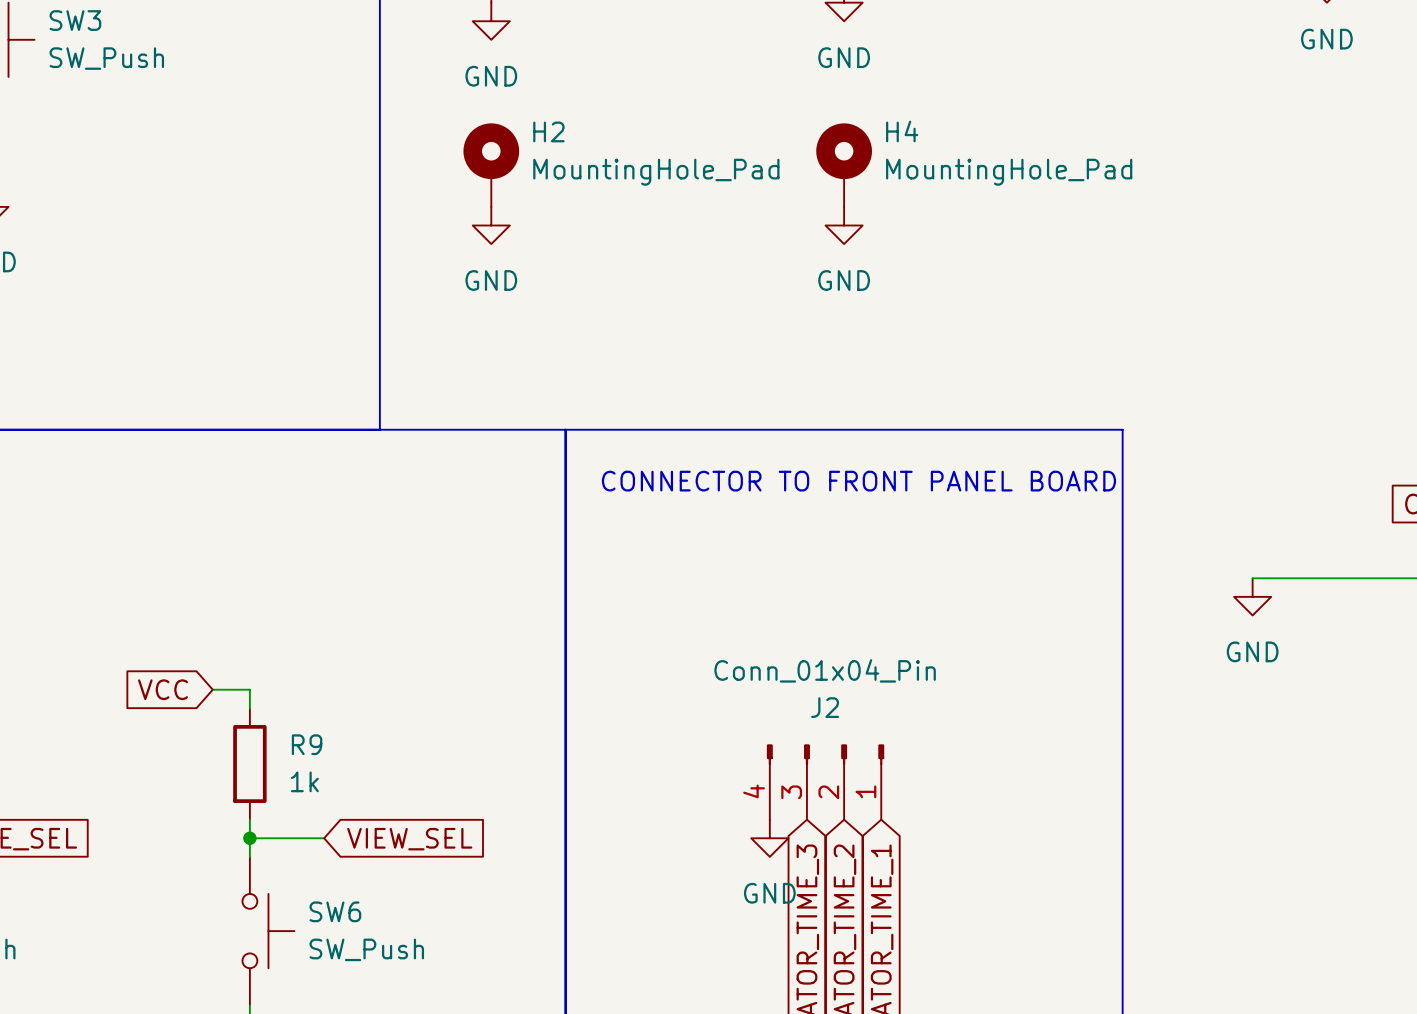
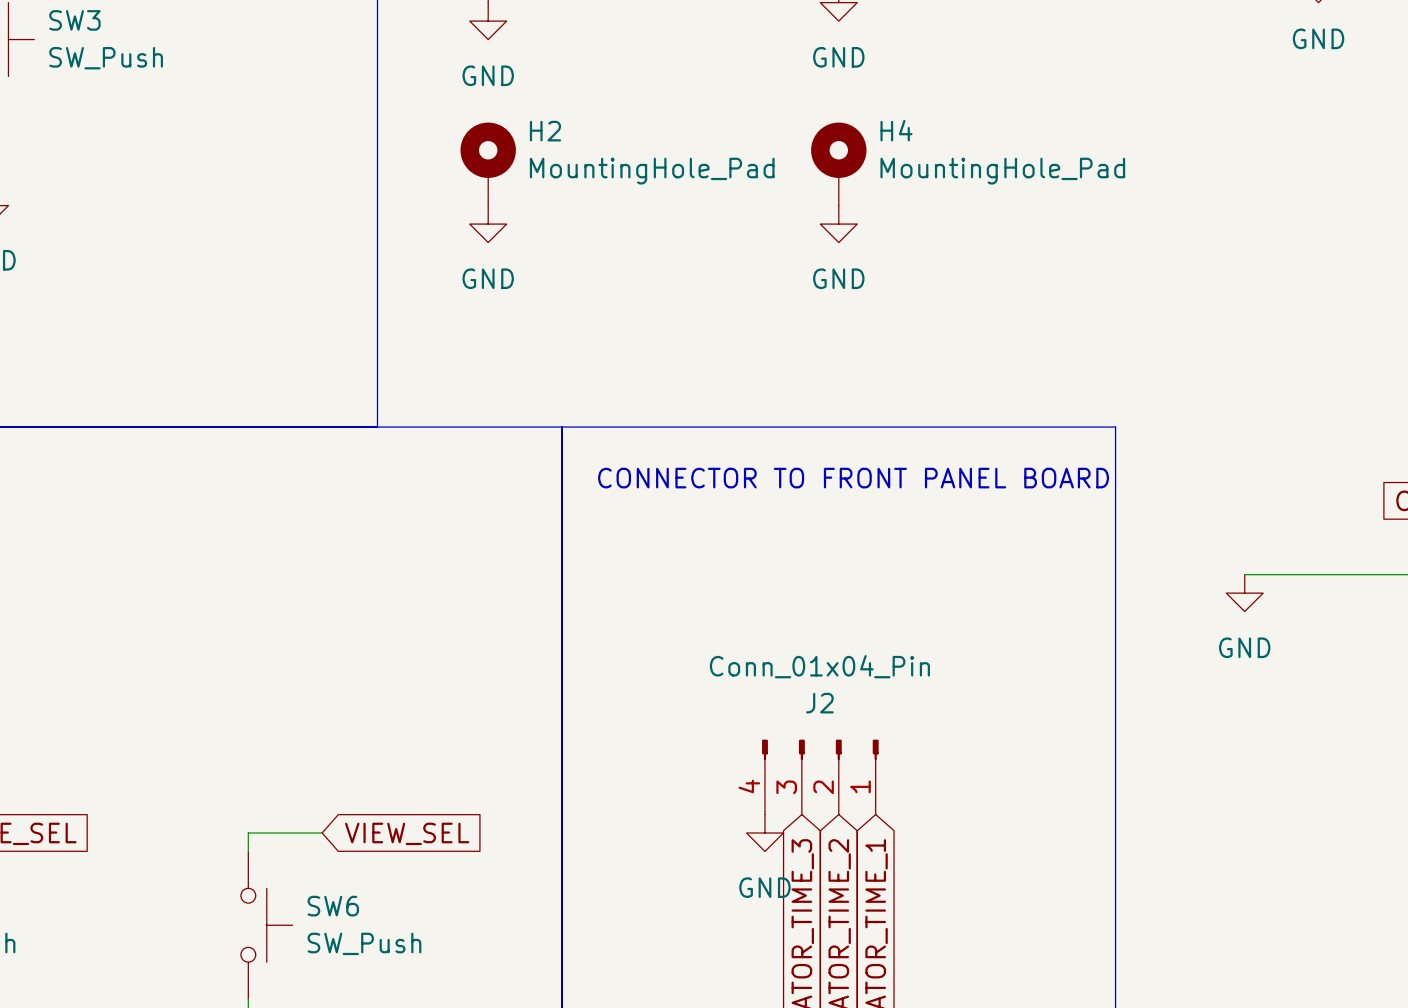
global label: VCC (163, 689) -> none
wire: (212, 689) (249, 689) (249, 708) -> none
R9: 1k (249, 763) -> none
wire: (249, 819) (249, 838) -> none
junction: (249, 838) -> none

